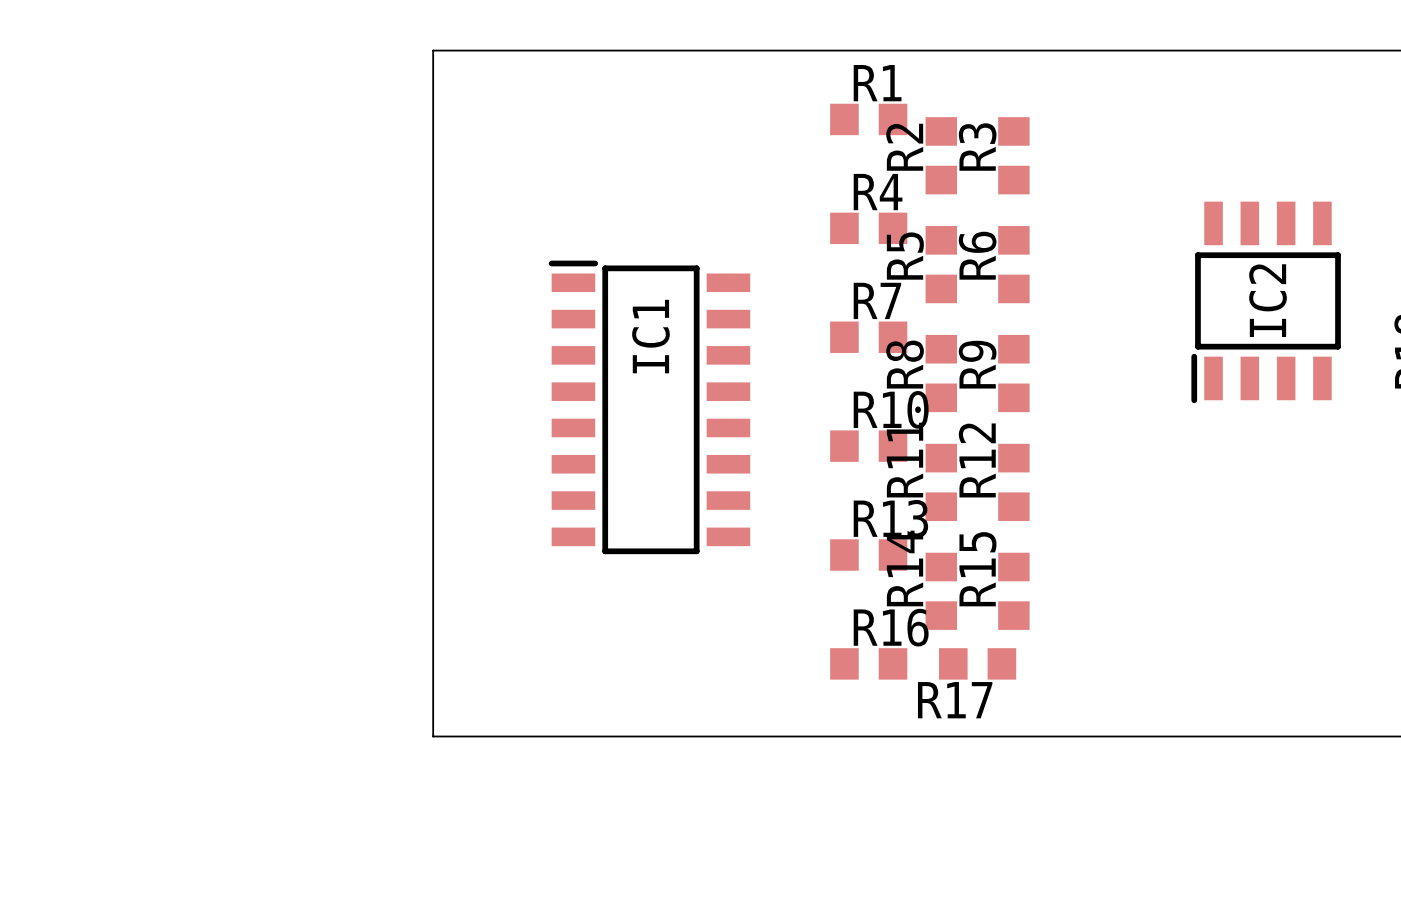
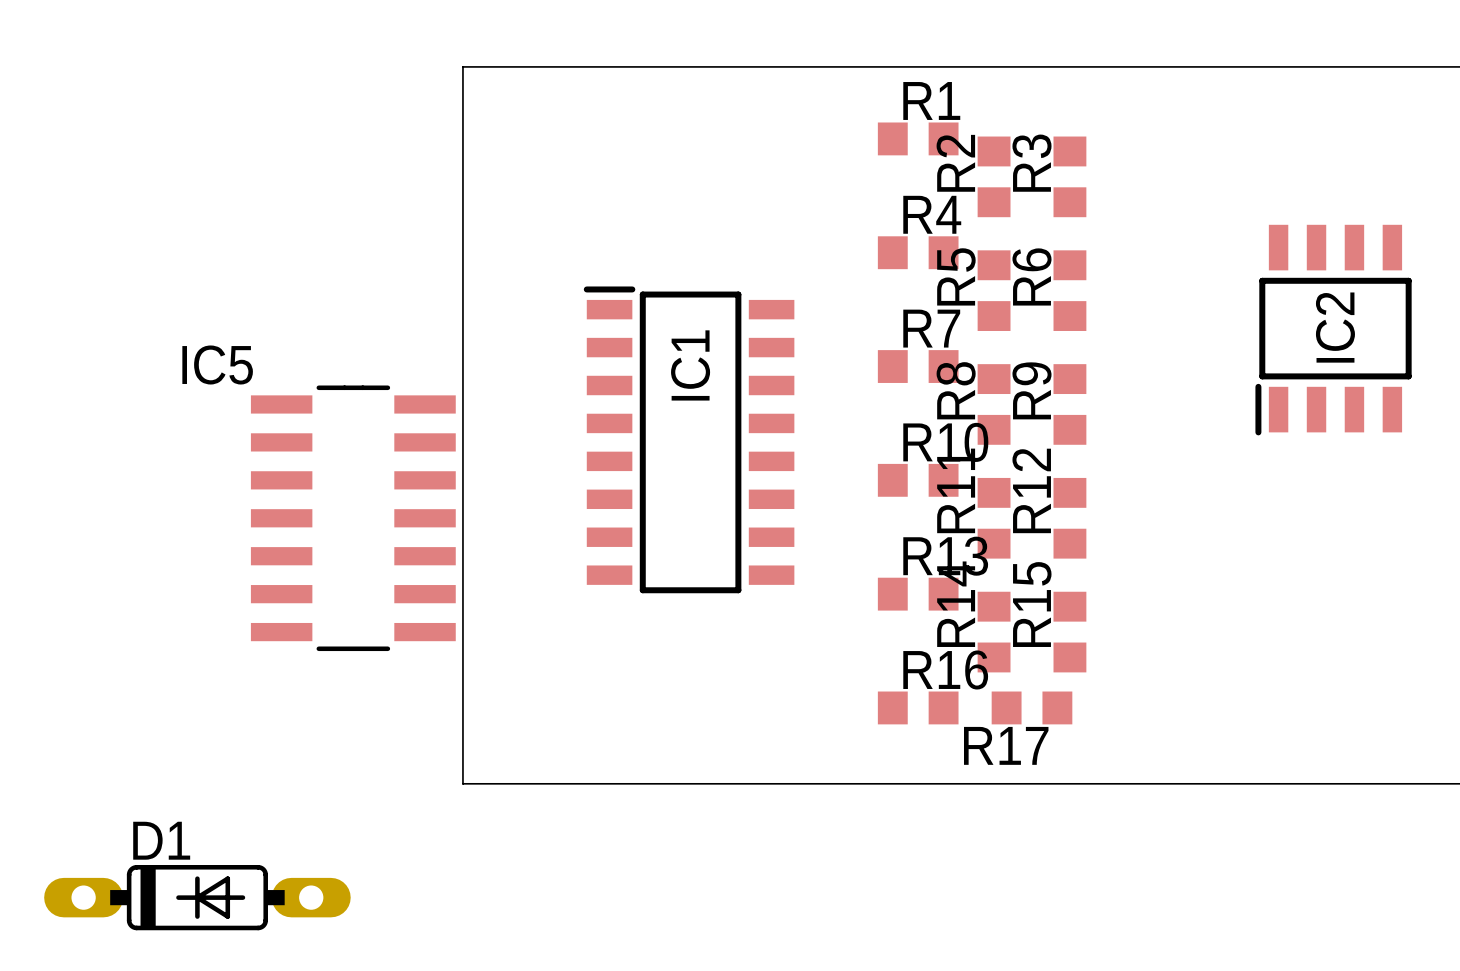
IC5: none -> (353, 518)
D1: none -> (197, 897)

